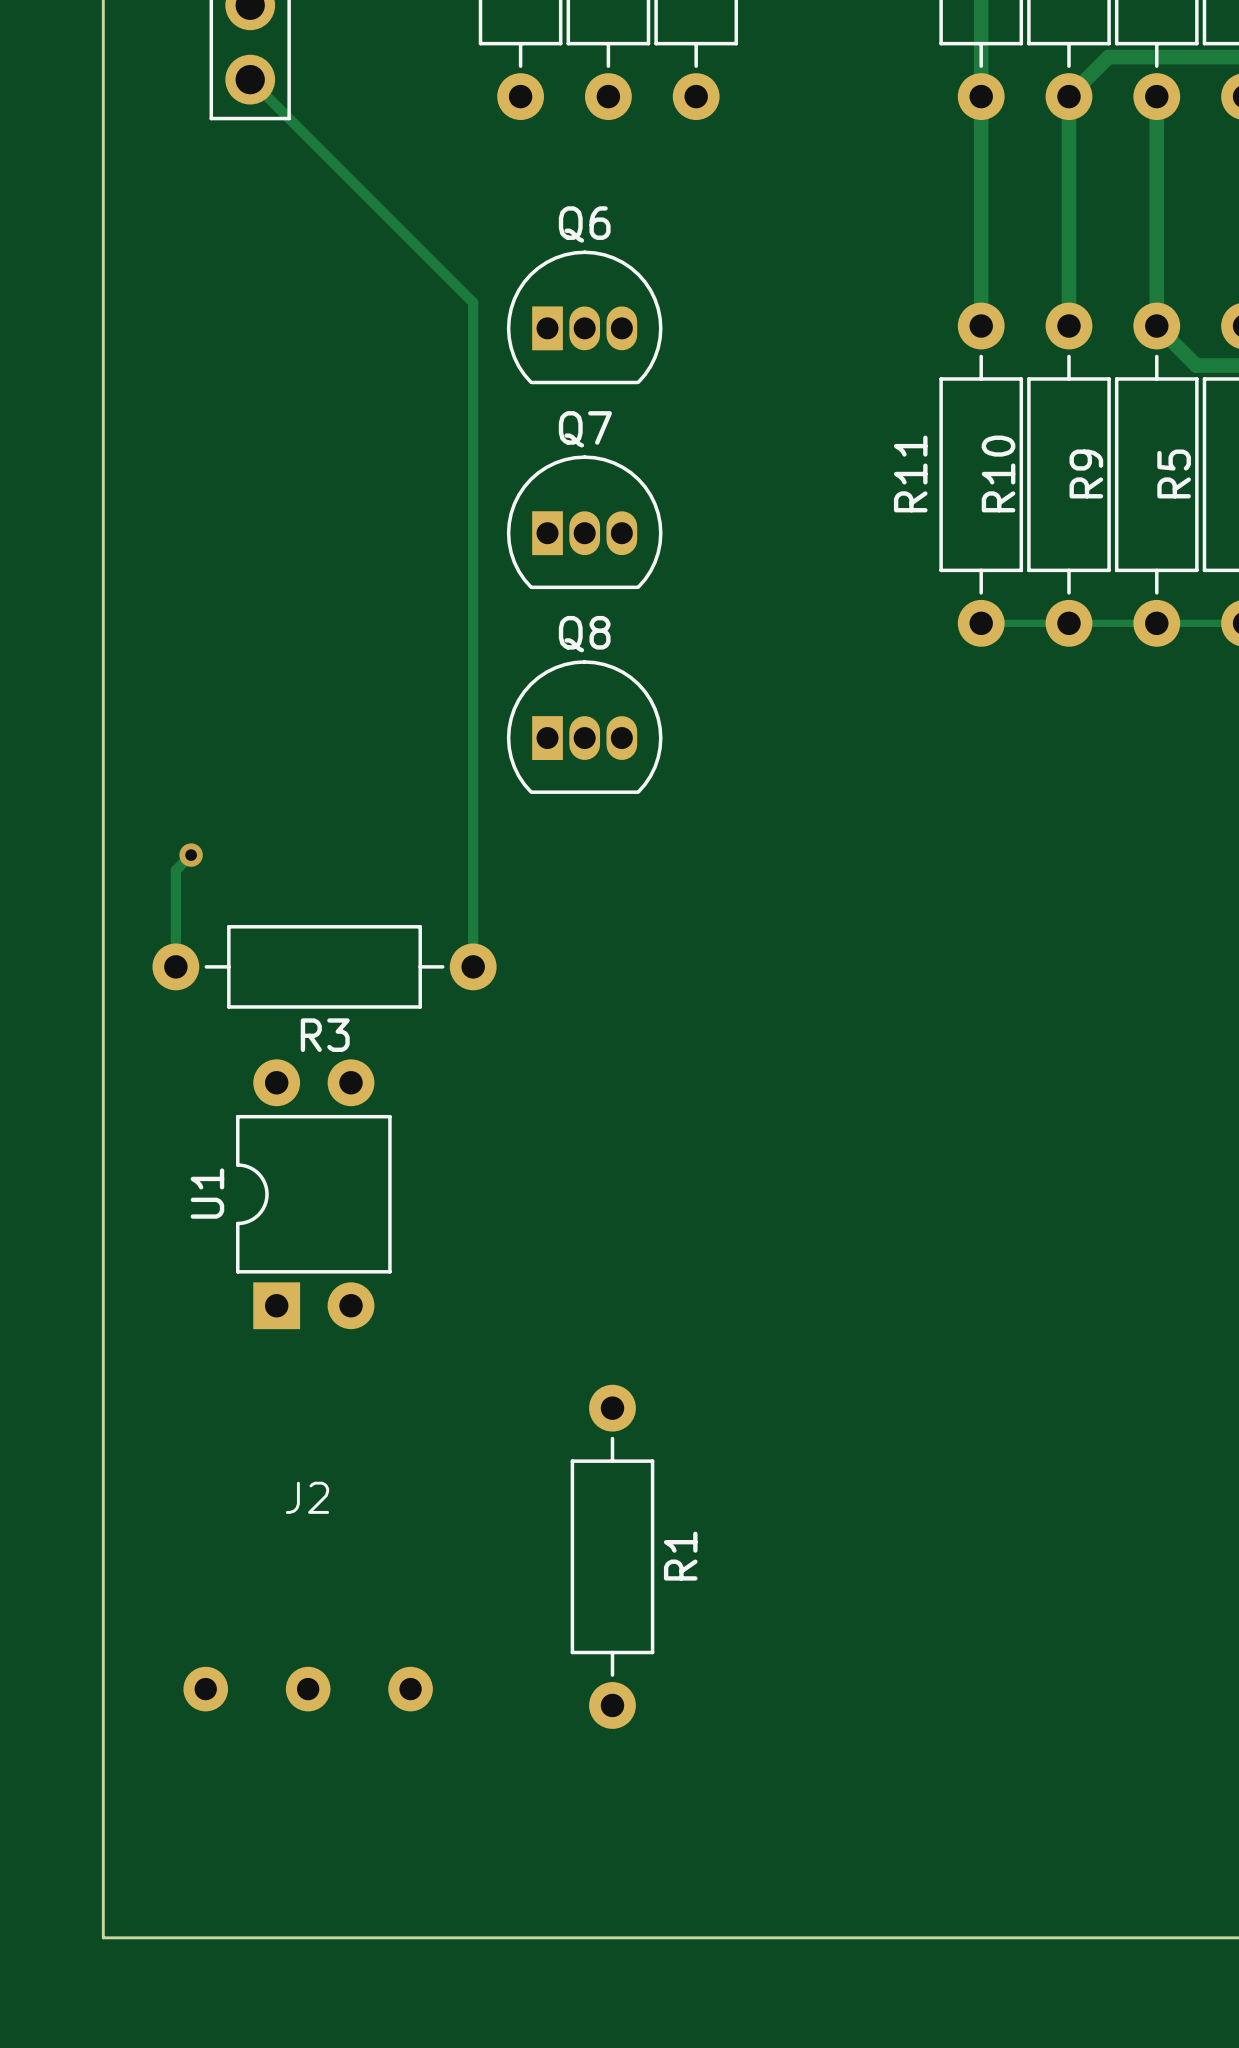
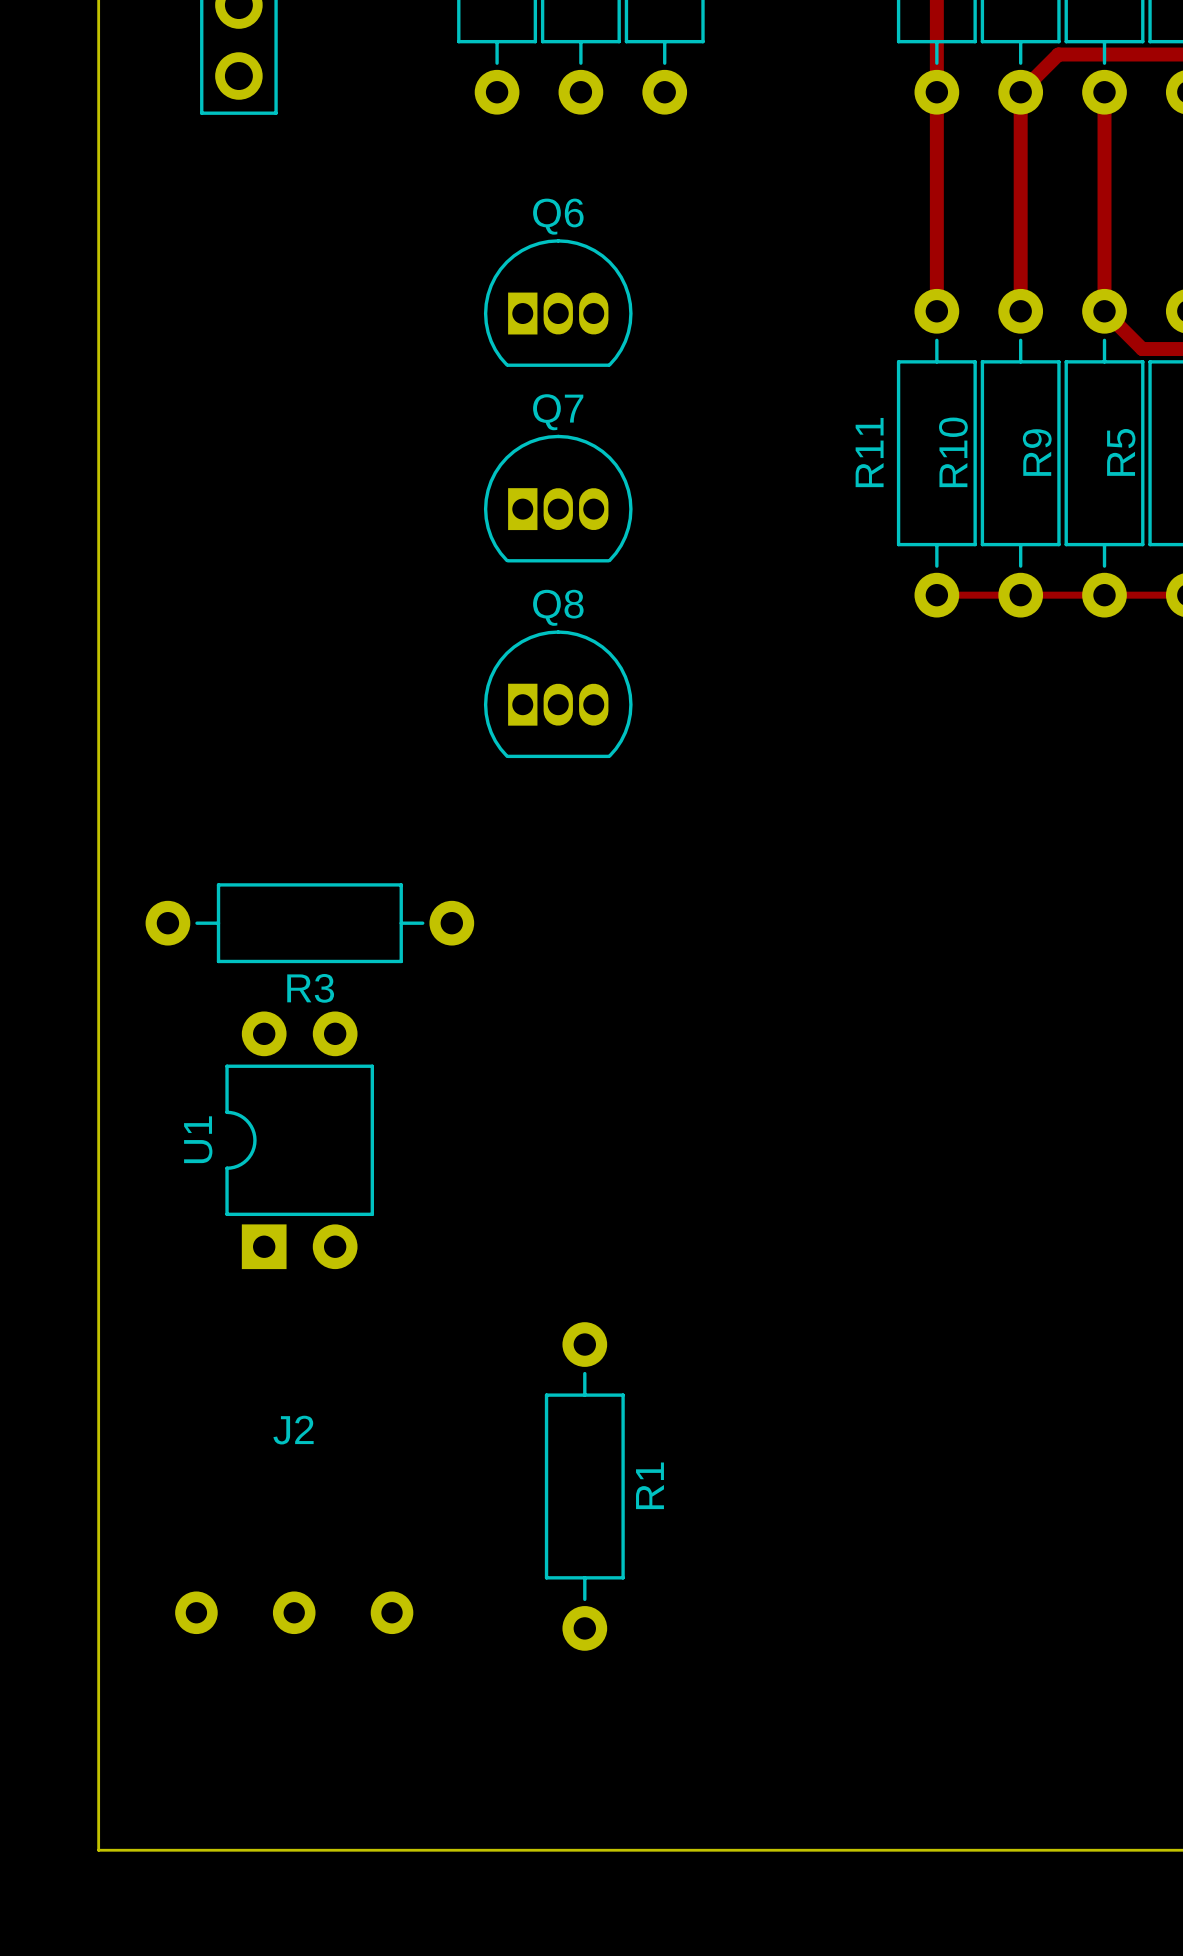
track: (250, 79) (473, 302) (473, 966) -> none
track: (191, 855) (175, 870) (175, 966) -> none
via: (191, 855) -> none

